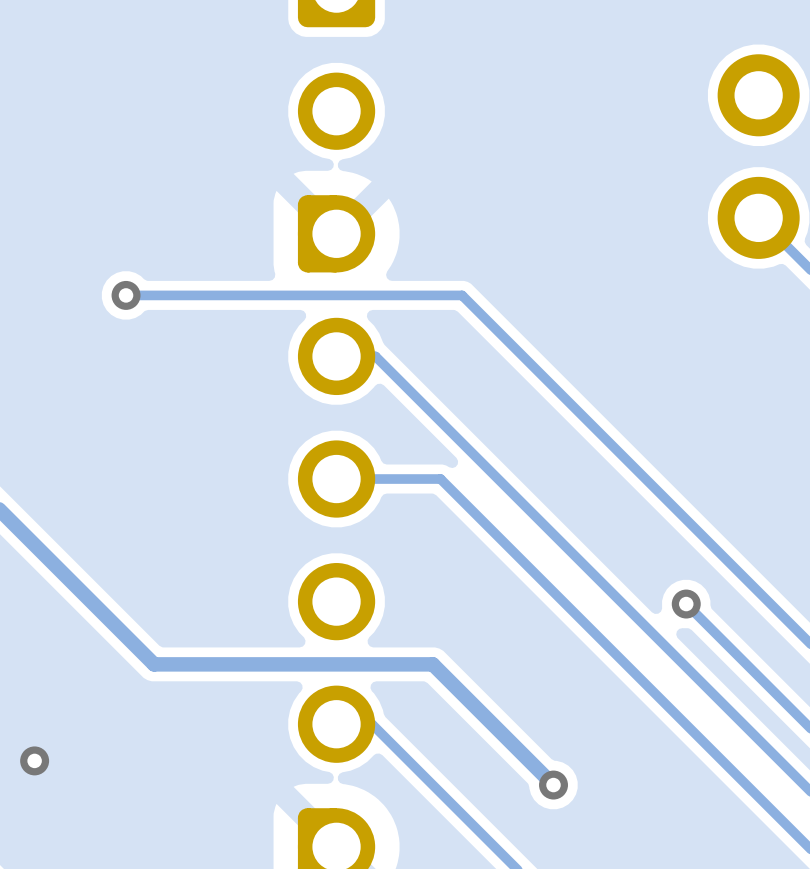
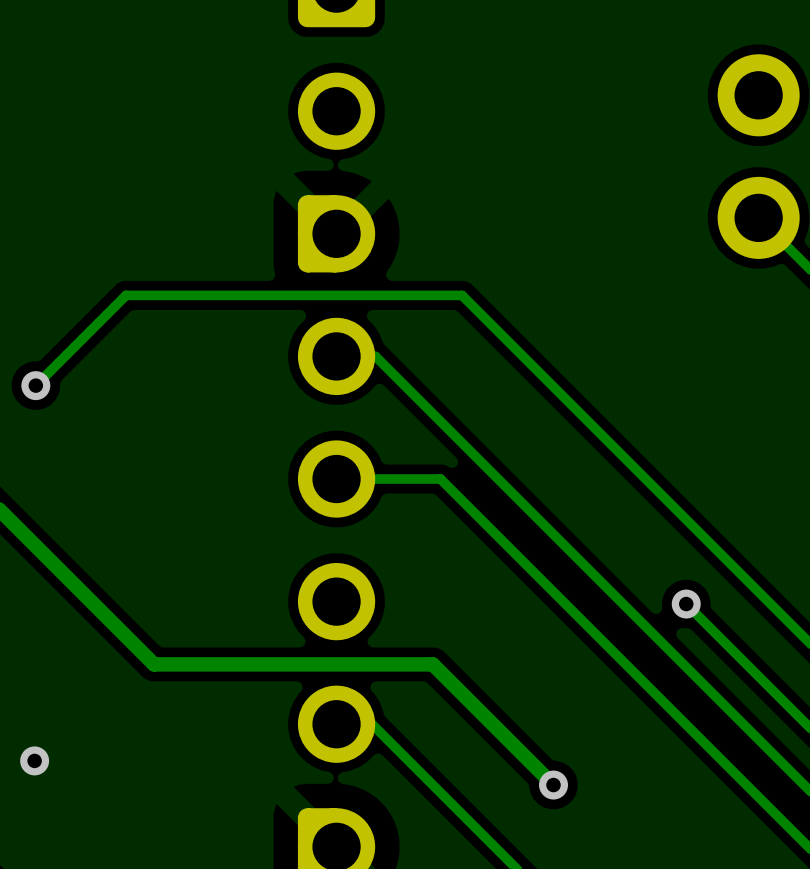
track: none -> (126, 295) (35, 385)
via position: (126, 295) -> (35, 385)

